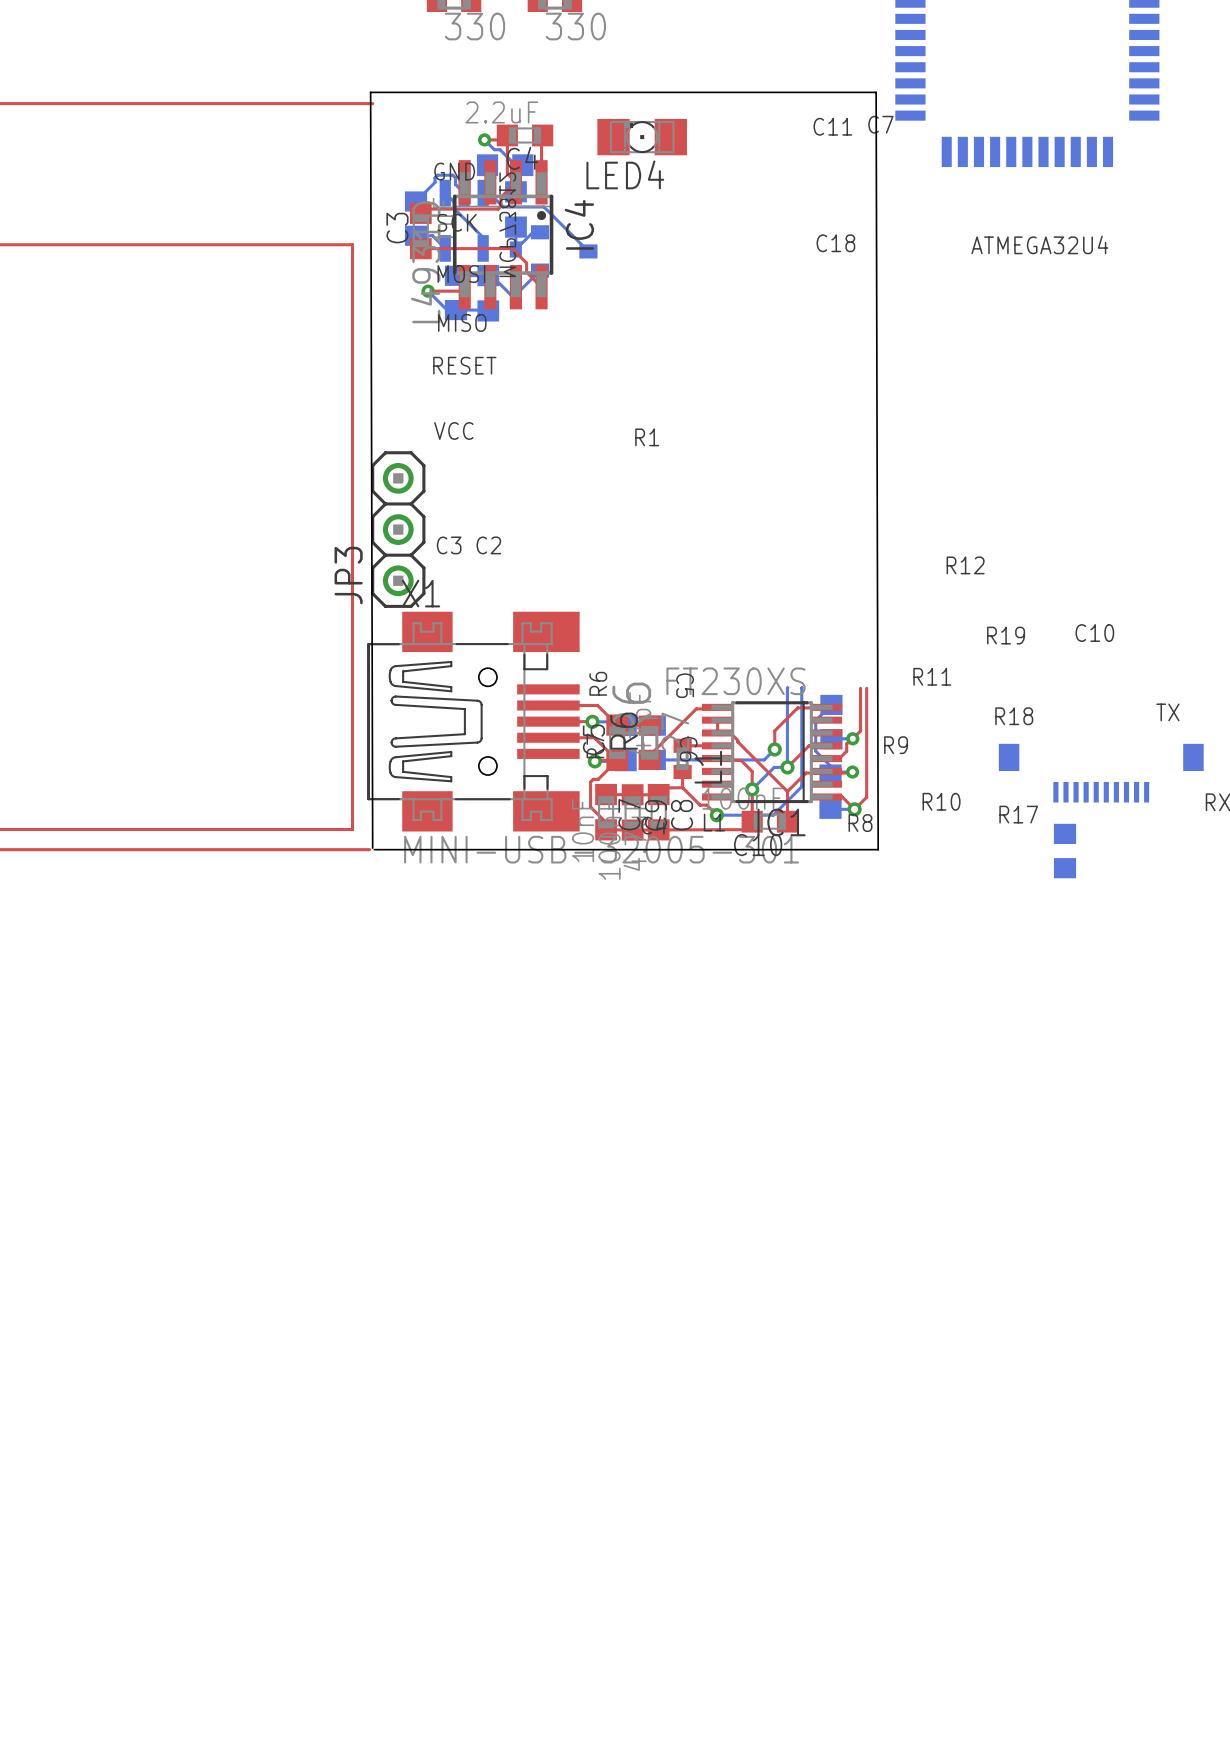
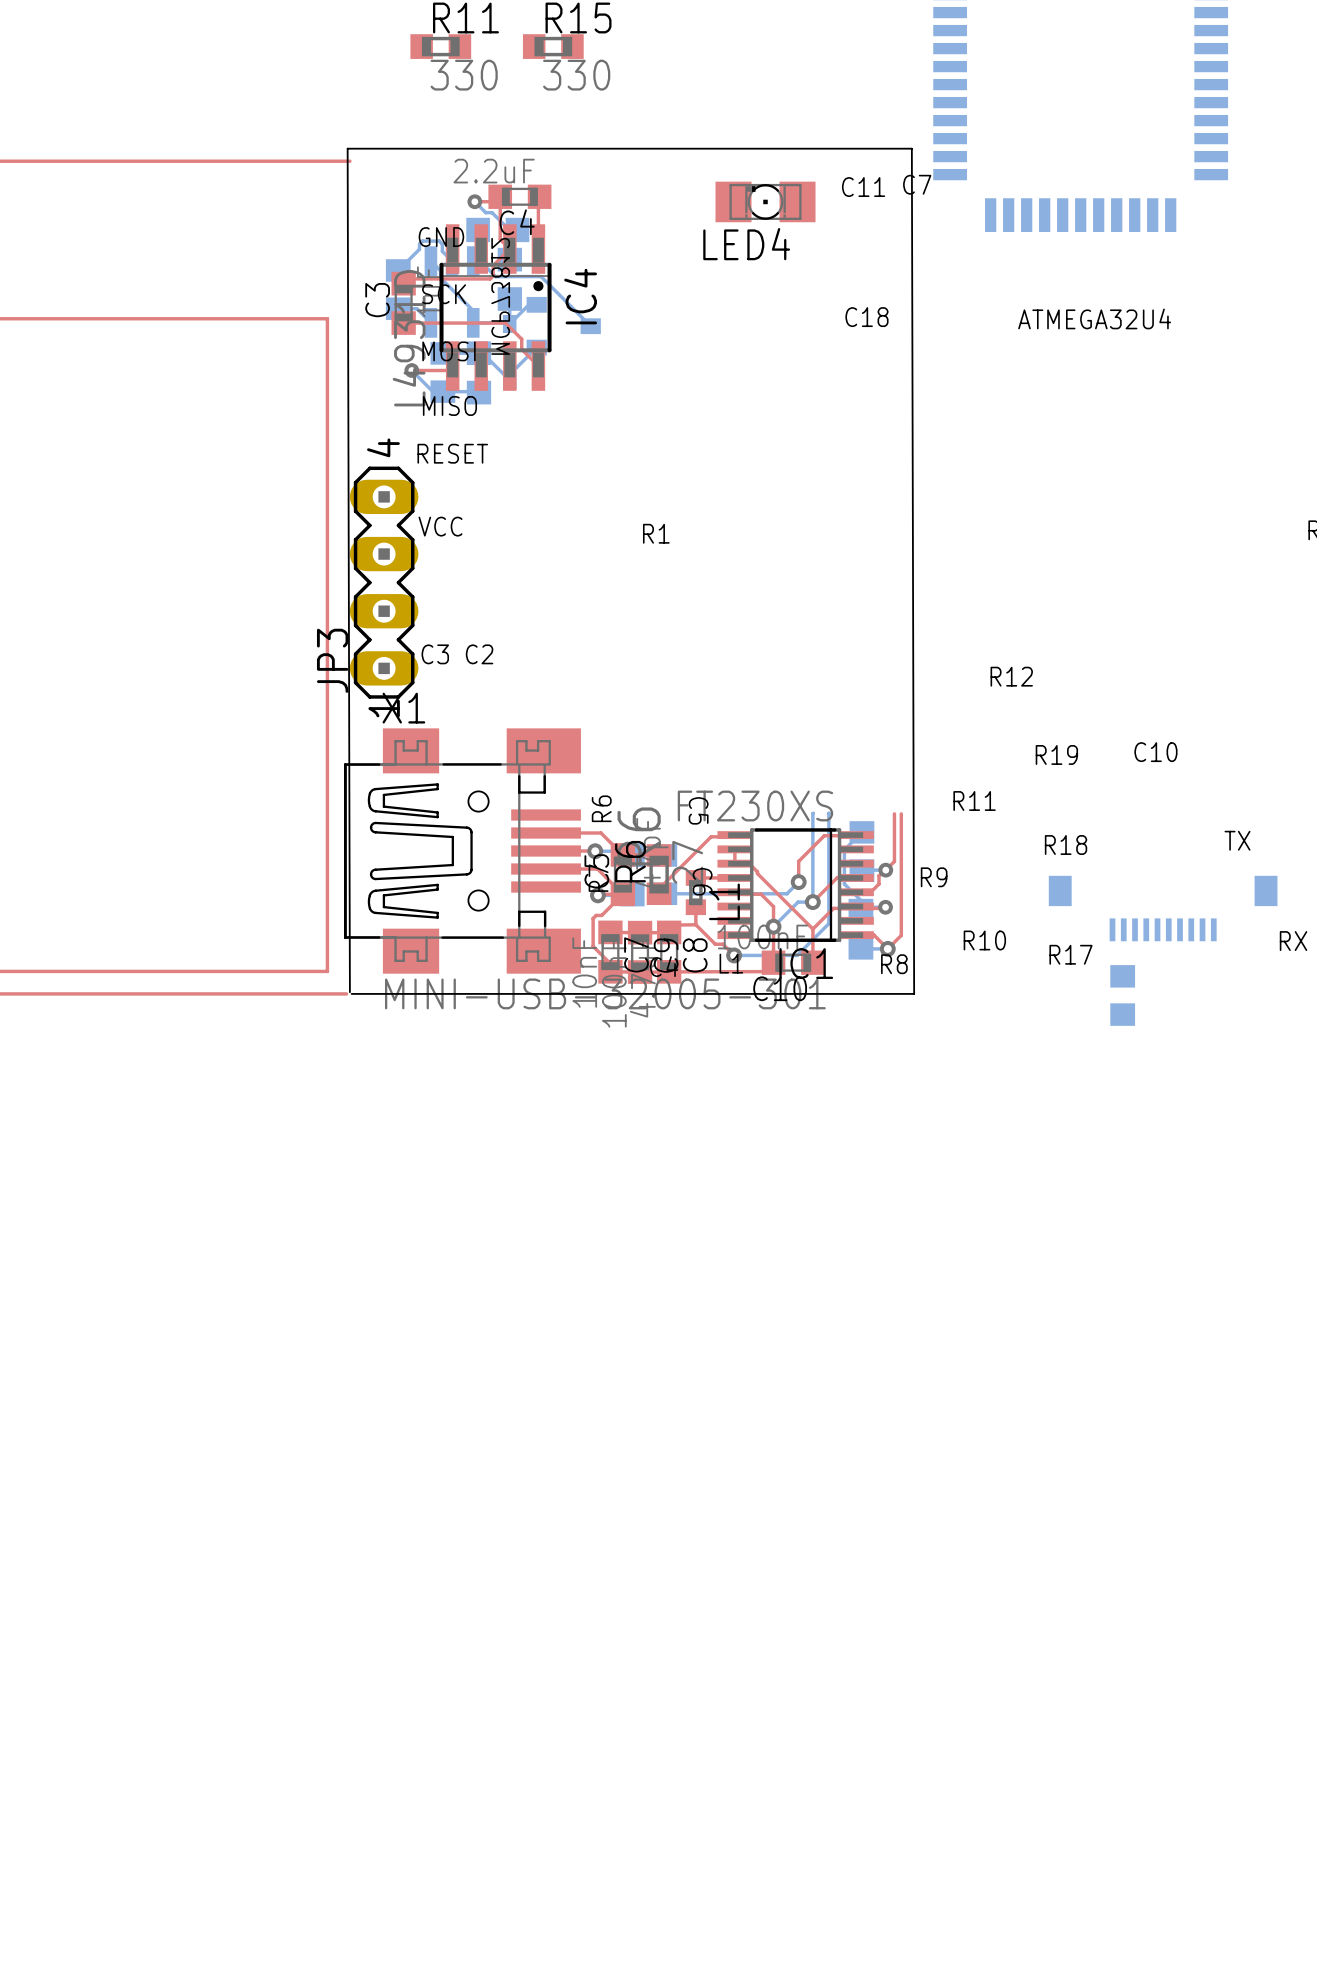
LED4 position: (642, 137) -> (765, 201)
JP3 footprint: [371, 451, 426, 608] -> [349, 466, 419, 699]

